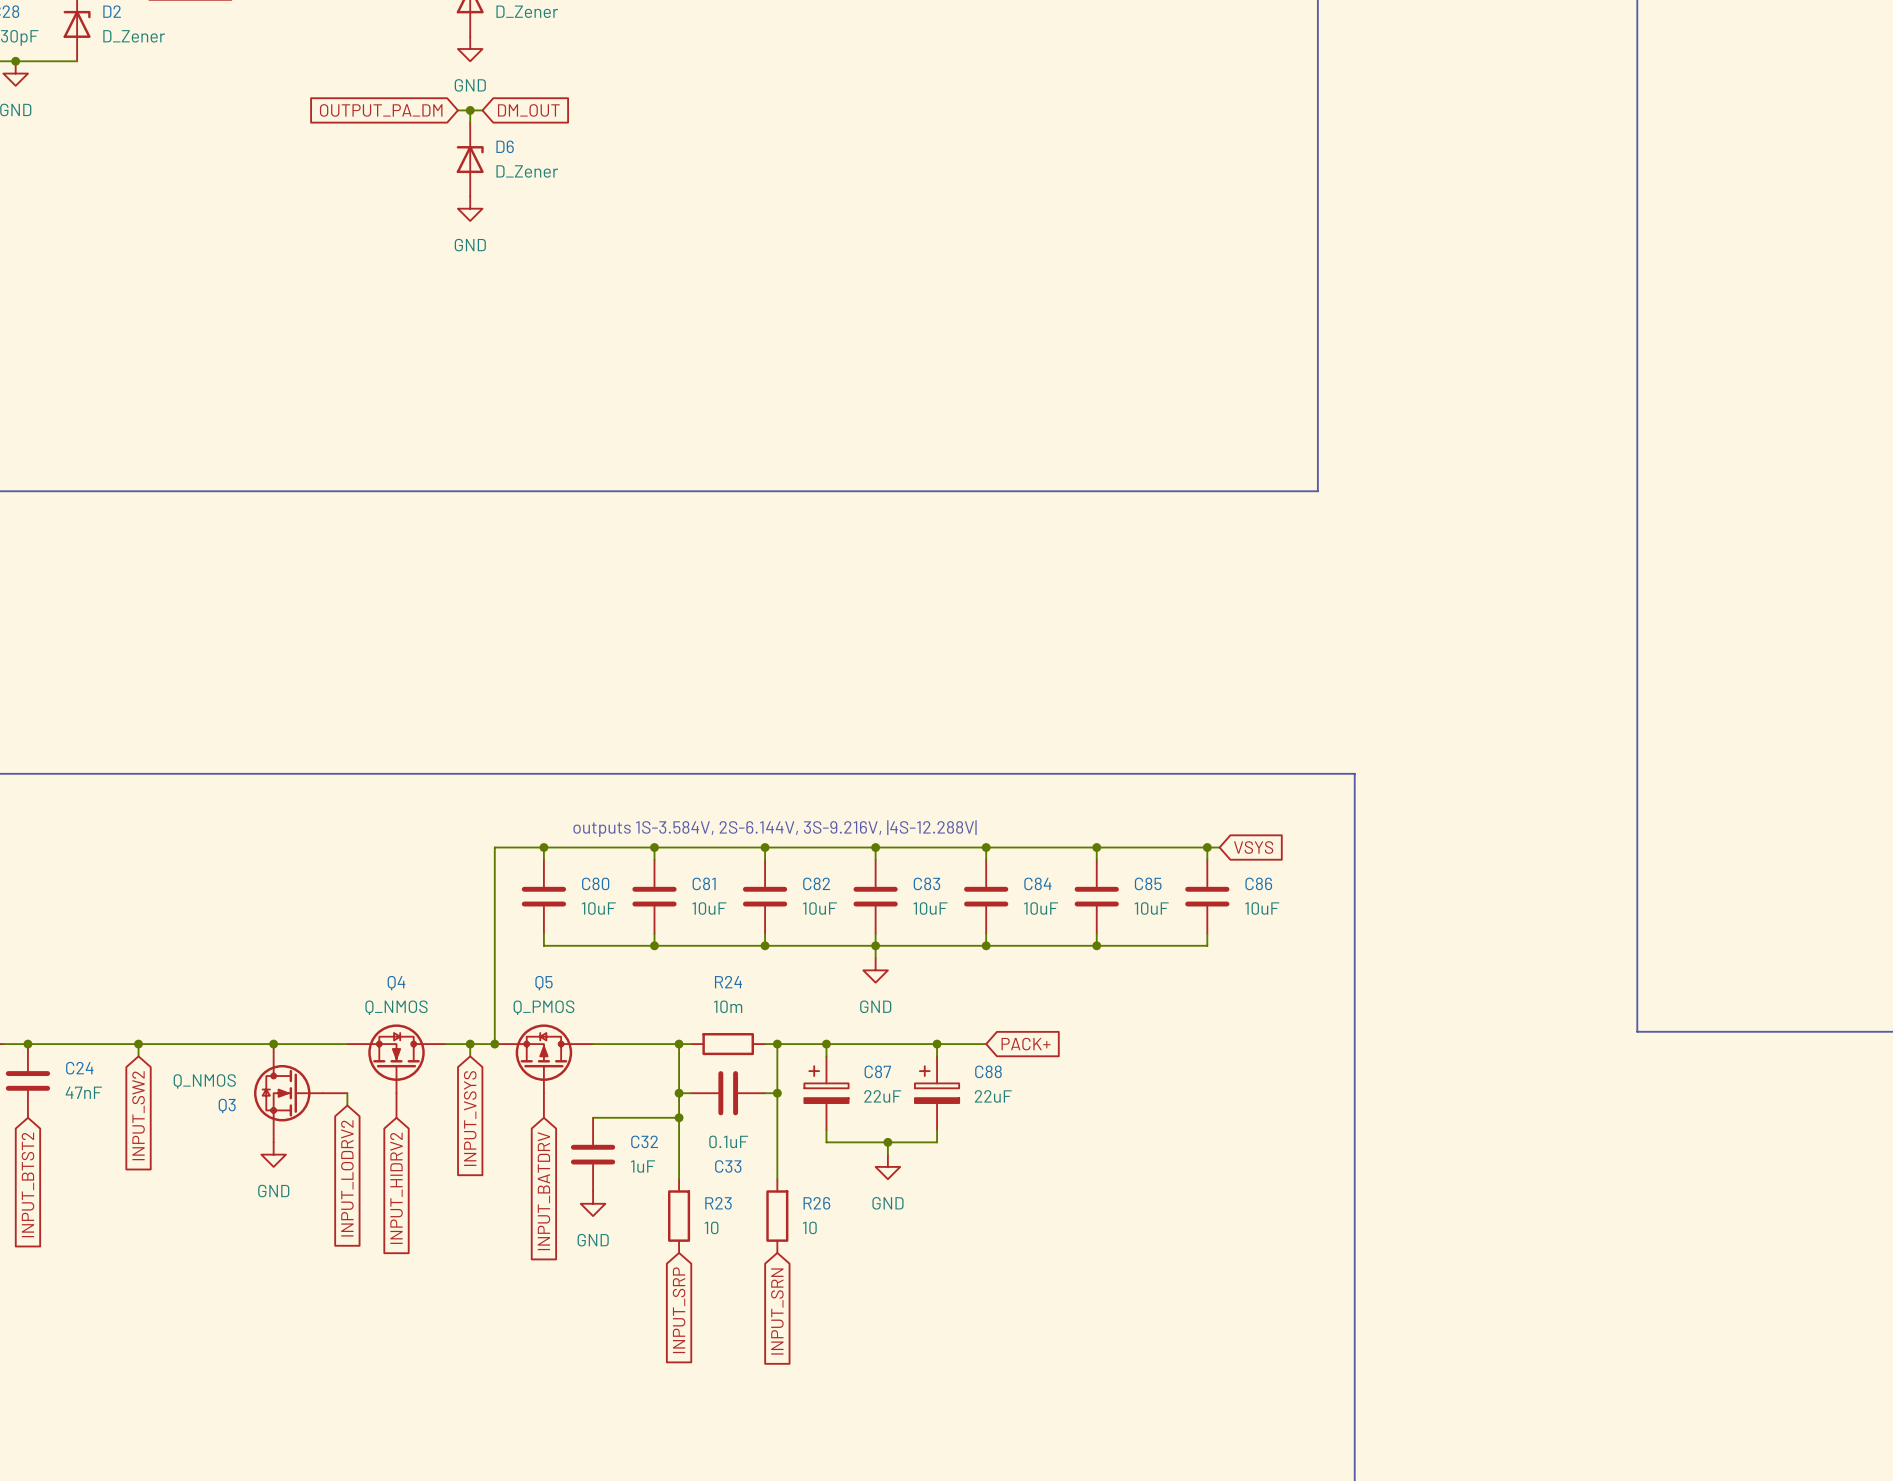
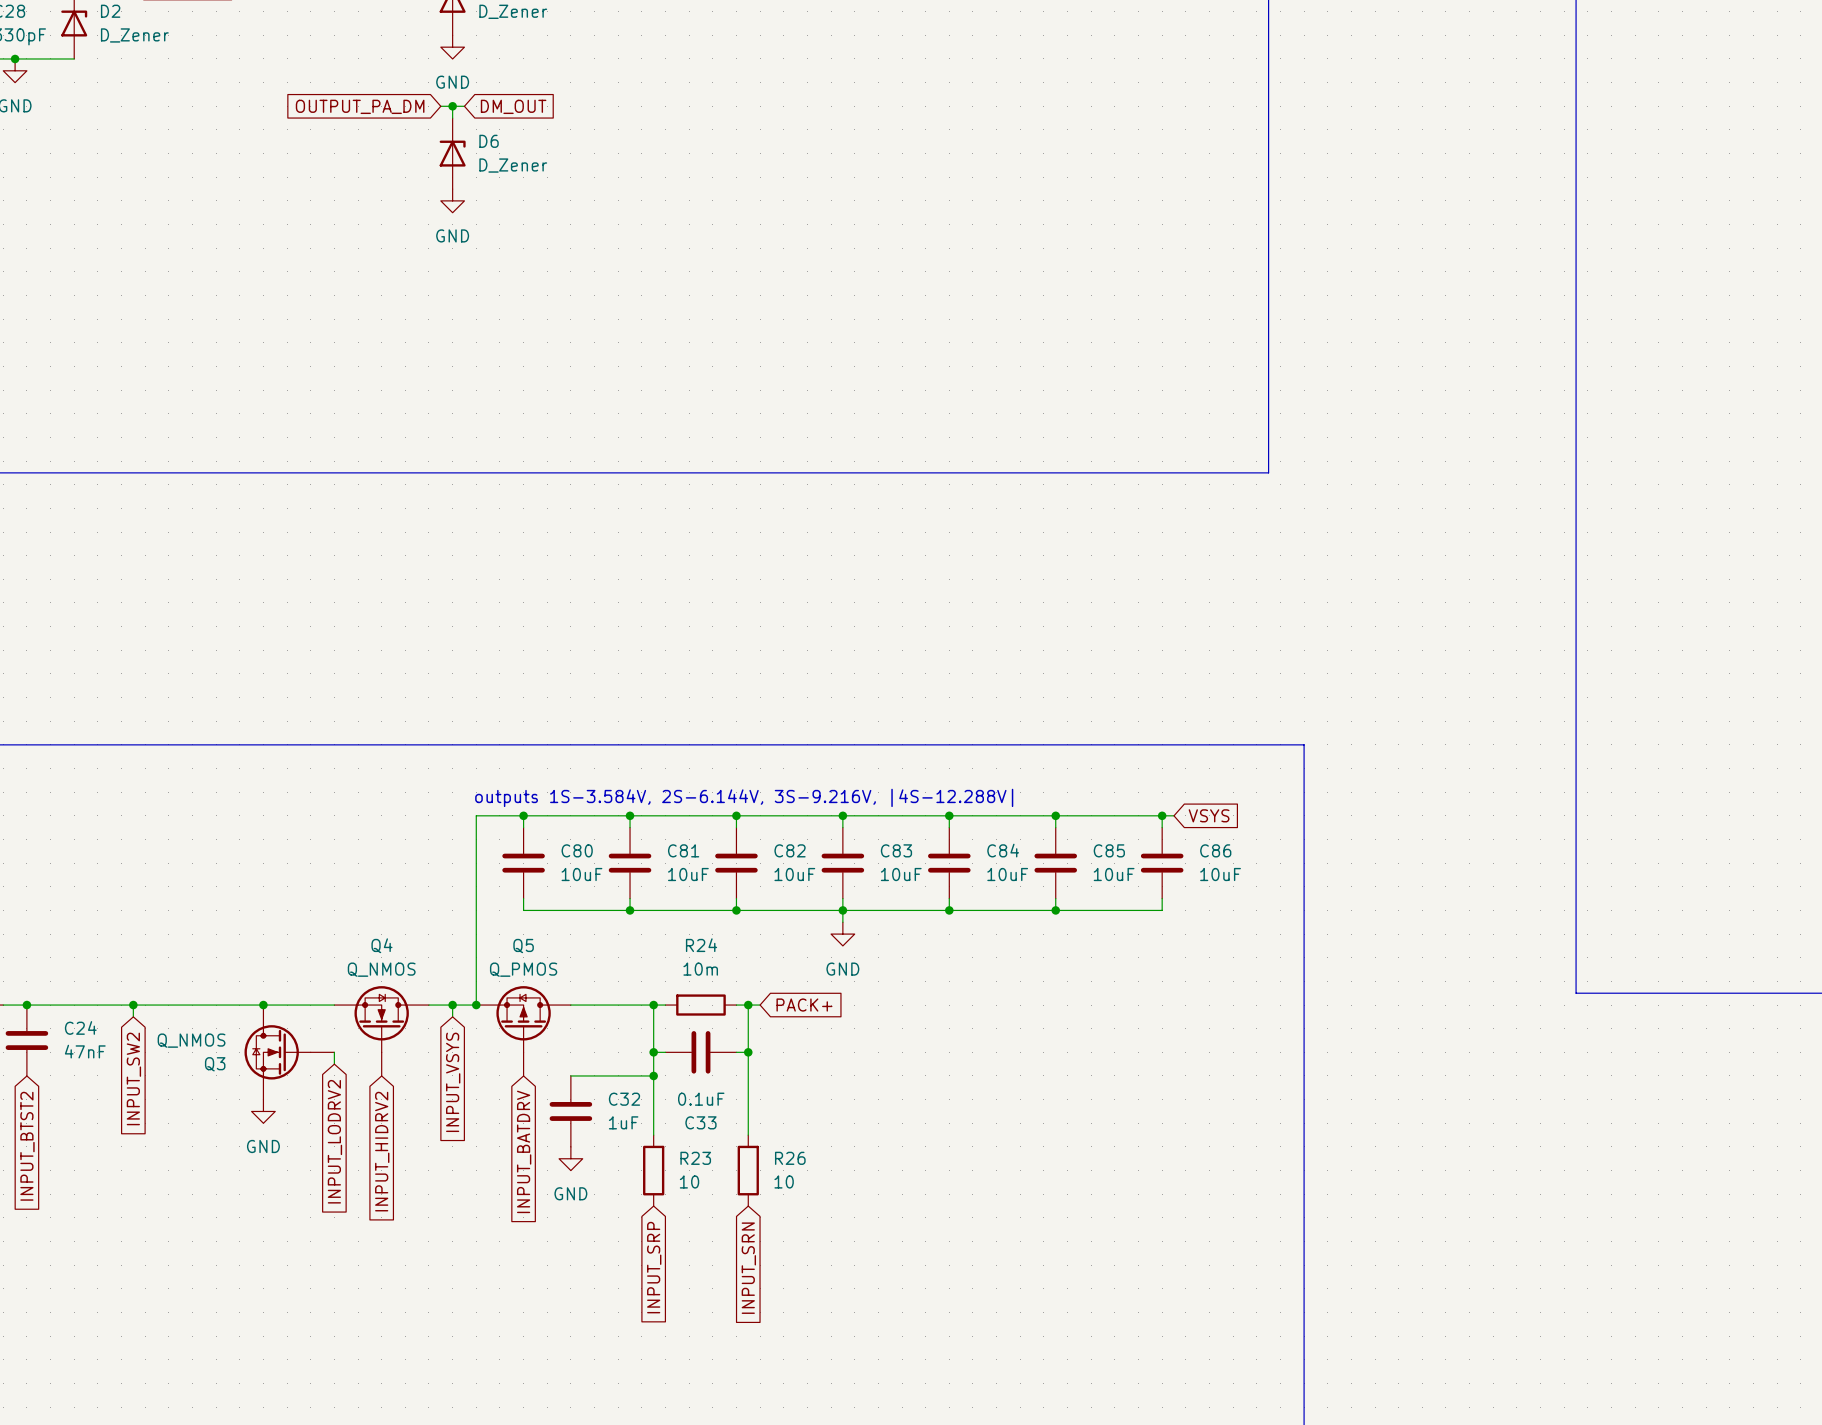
wire: (789, 1044) (986, 1044) -> none
wire: (826, 1044) (826, 1056) -> none
junction: (826, 1044) -> none
wire: (937, 1044) (937, 1056) -> none
junction: (937, 1044) -> none
global label position: PACK+ (1026, 1044) -> PACK+ (804, 1005)
C87: 22uF (826, 1093) -> none
C88: 22uF (937, 1093) -> none
wire: (826, 1130) (826, 1142) (937, 1142) (937, 1130) -> none
wire: (887, 1142) (887, 1154) -> none
junction: (887, 1142) -> none
power symbol: GND (887, 1166) -> none

